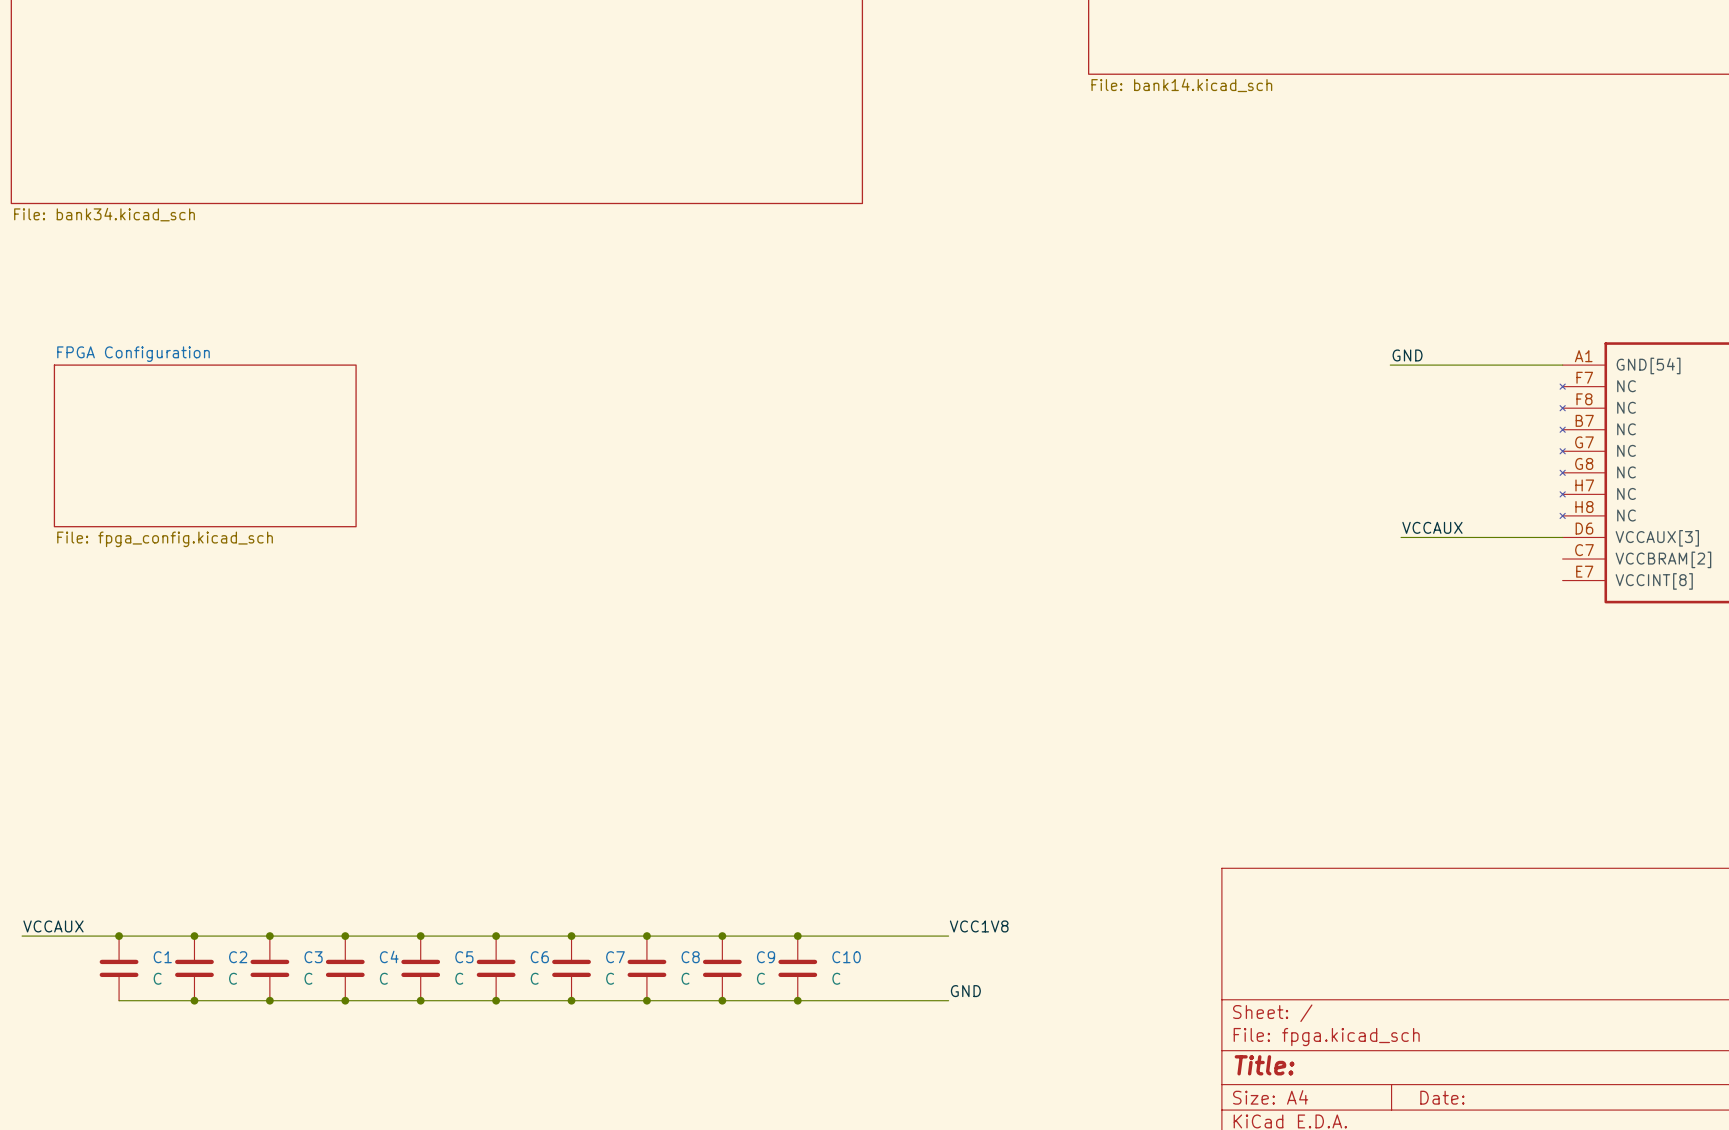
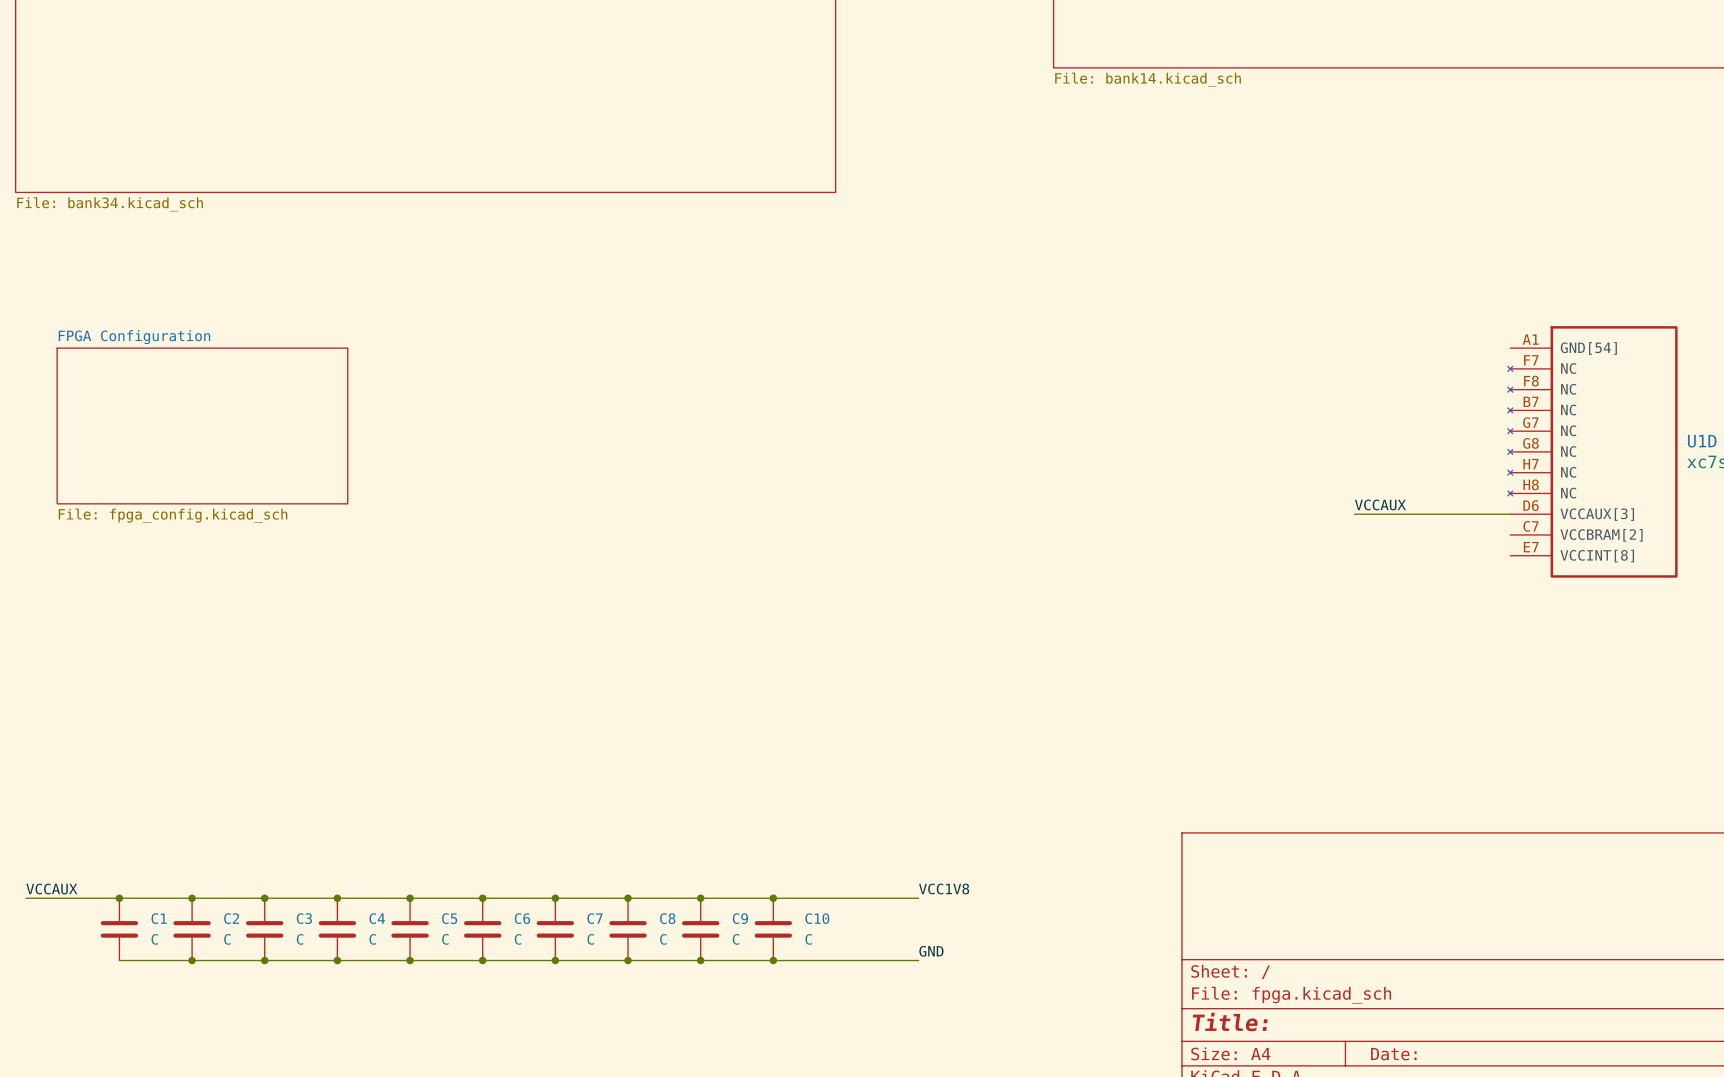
label: GND (1407, 355) -> none
wire: (1390, 365) (1562, 365) -> none

